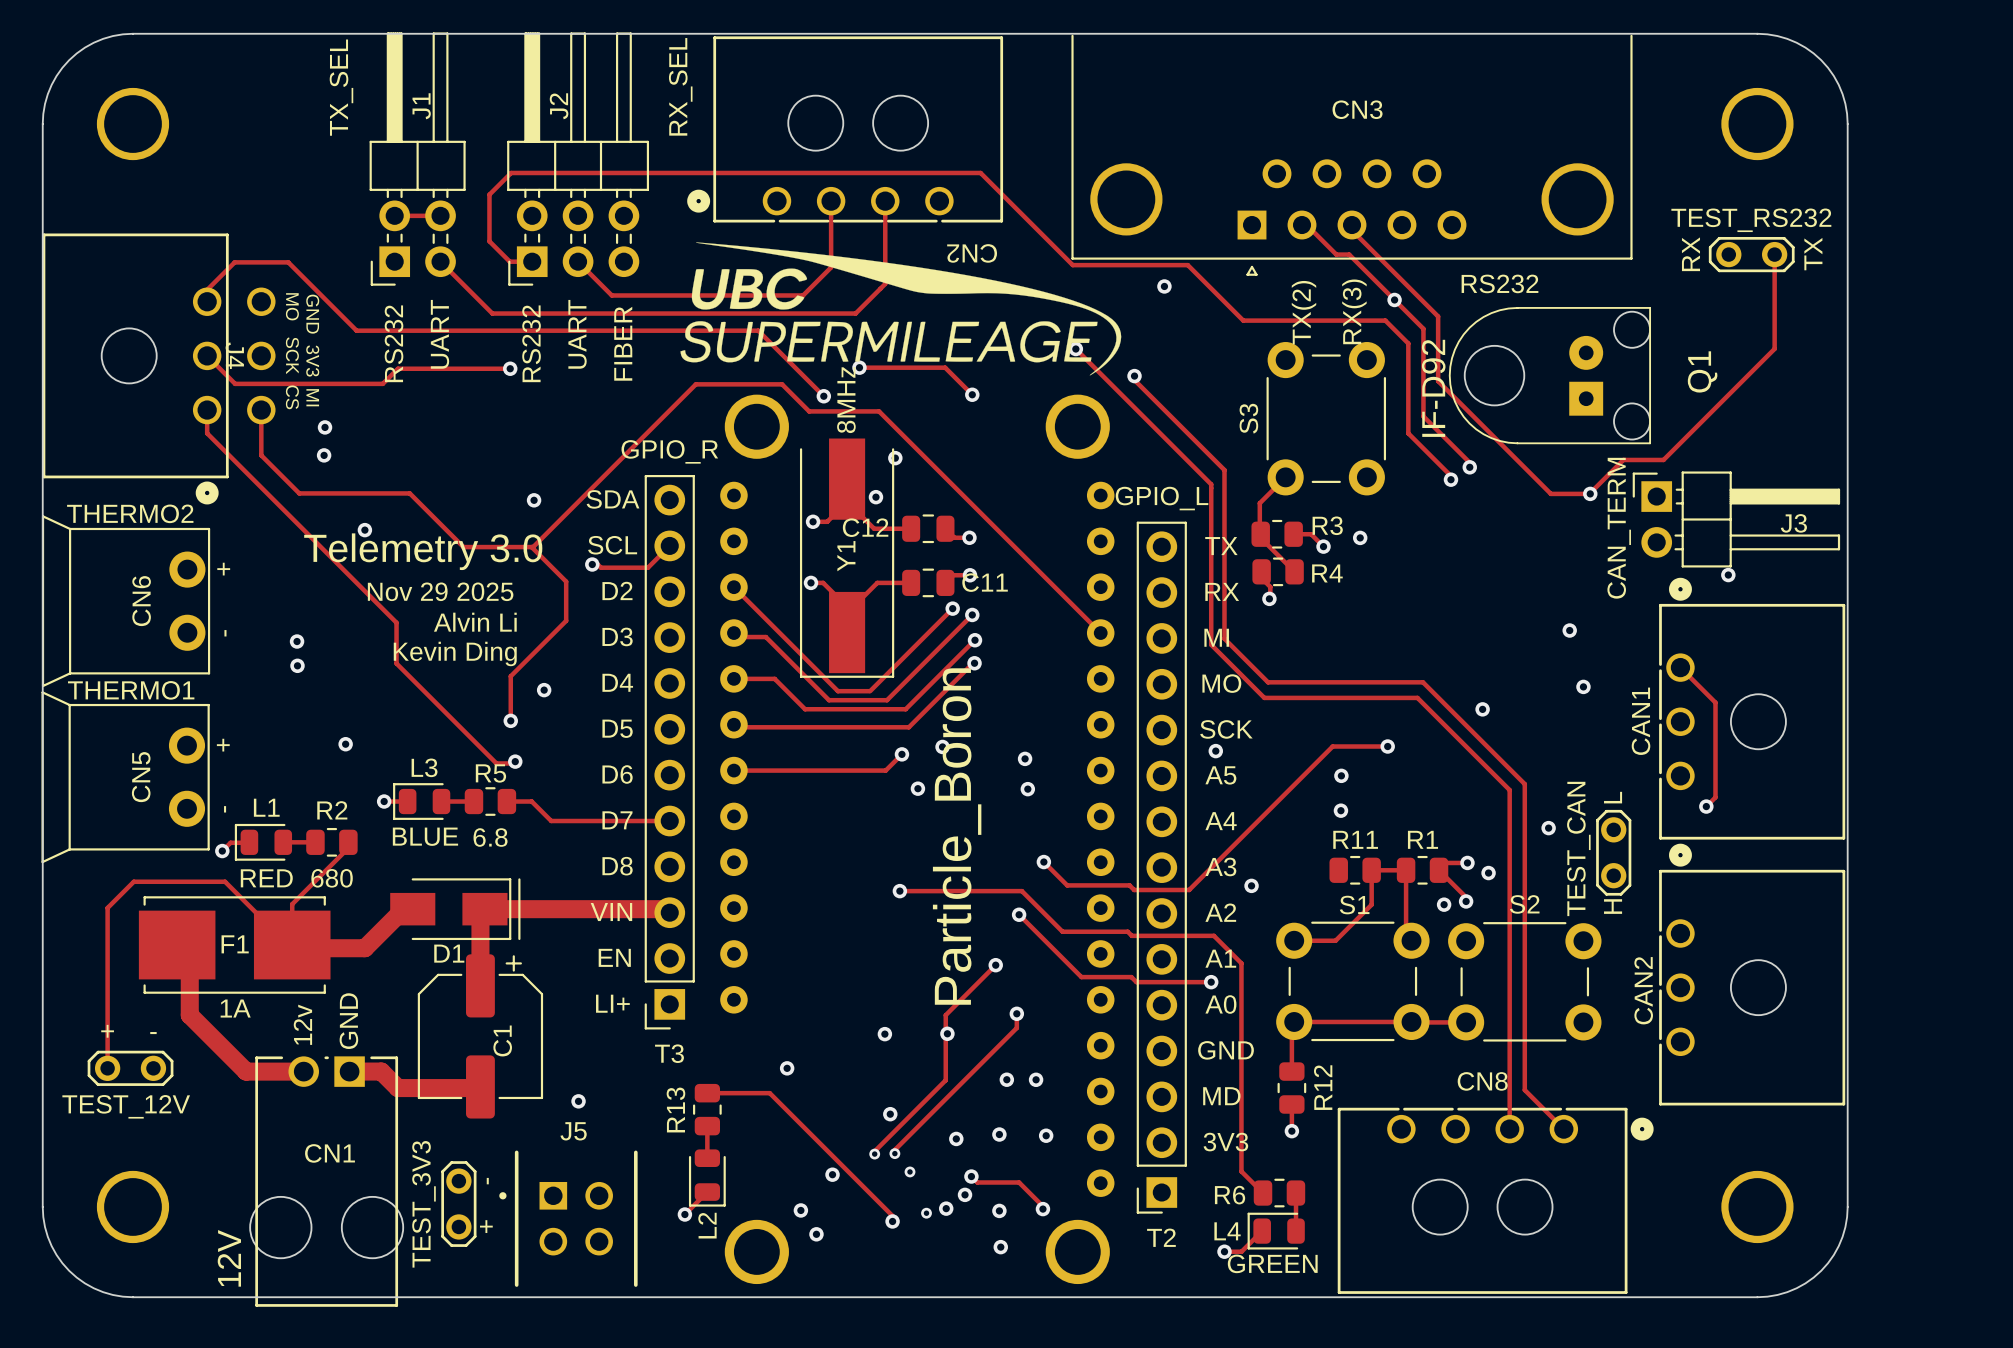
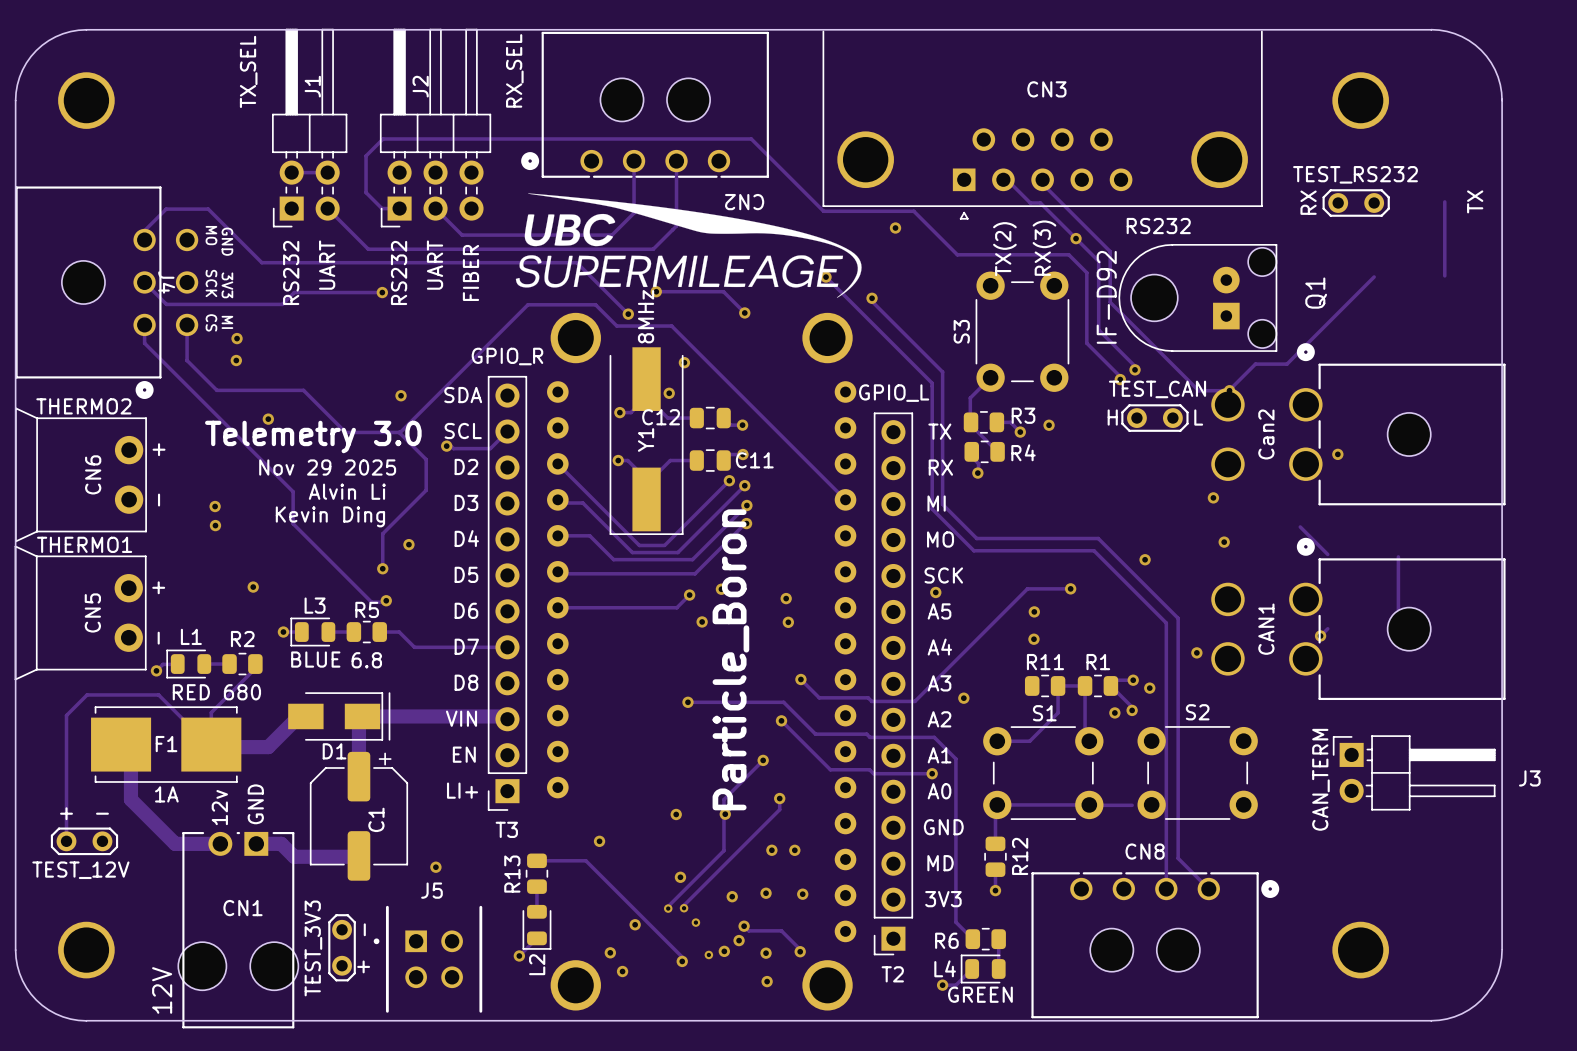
board edge: (1757, 33) (1777, 36) (1796, 42) (1821, 60) (1838, 84) (1845, 103) (1847, 124) (1847, 1206) (1845, 1227) (1838, 1246) (1827, 1263) (1813, 1277) (1787, 1292) (1757, 1297) (132, 1297) -> (1502, 949) (1498, 973) (1491, 987) (1481, 1000) (1468, 1009) (1454, 1016) (1431, 1020) (86, 1020)
board edge: none -> (1360, 29) (1431, 29)
board edge: none -> (1431, 29) (1454, 33) (1468, 40) (1481, 50) (1491, 62) (1498, 77) (1502, 100)
board edge: none -> (1502, 99) (1502, 948)
track: (1774, 254) (1774, 348) -> (1444, 201) (1444, 275)
part text position: TX (1813, 254) -> TX (1475, 201)
J3 position: (1736, 519) -> (1414, 772)
J3 name position: J3 (1793, 523) -> J3 (1529, 778)
Can2: none -> (1358, 424)
CAN1 footprint: [1659, 577, 1846, 840] -> [1211, 537, 1506, 701]
track: (1715, 702) (1715, 797) -> (1398, 556) (1398, 631)
part rotation: 0° (1613, 852) -> 90° clockwise (1154, 418)
part position: (1613, 852) -> (1154, 418)
CAN2: (1752, 974) -> none
S2 position: (1524, 981) -> (1197, 772)

